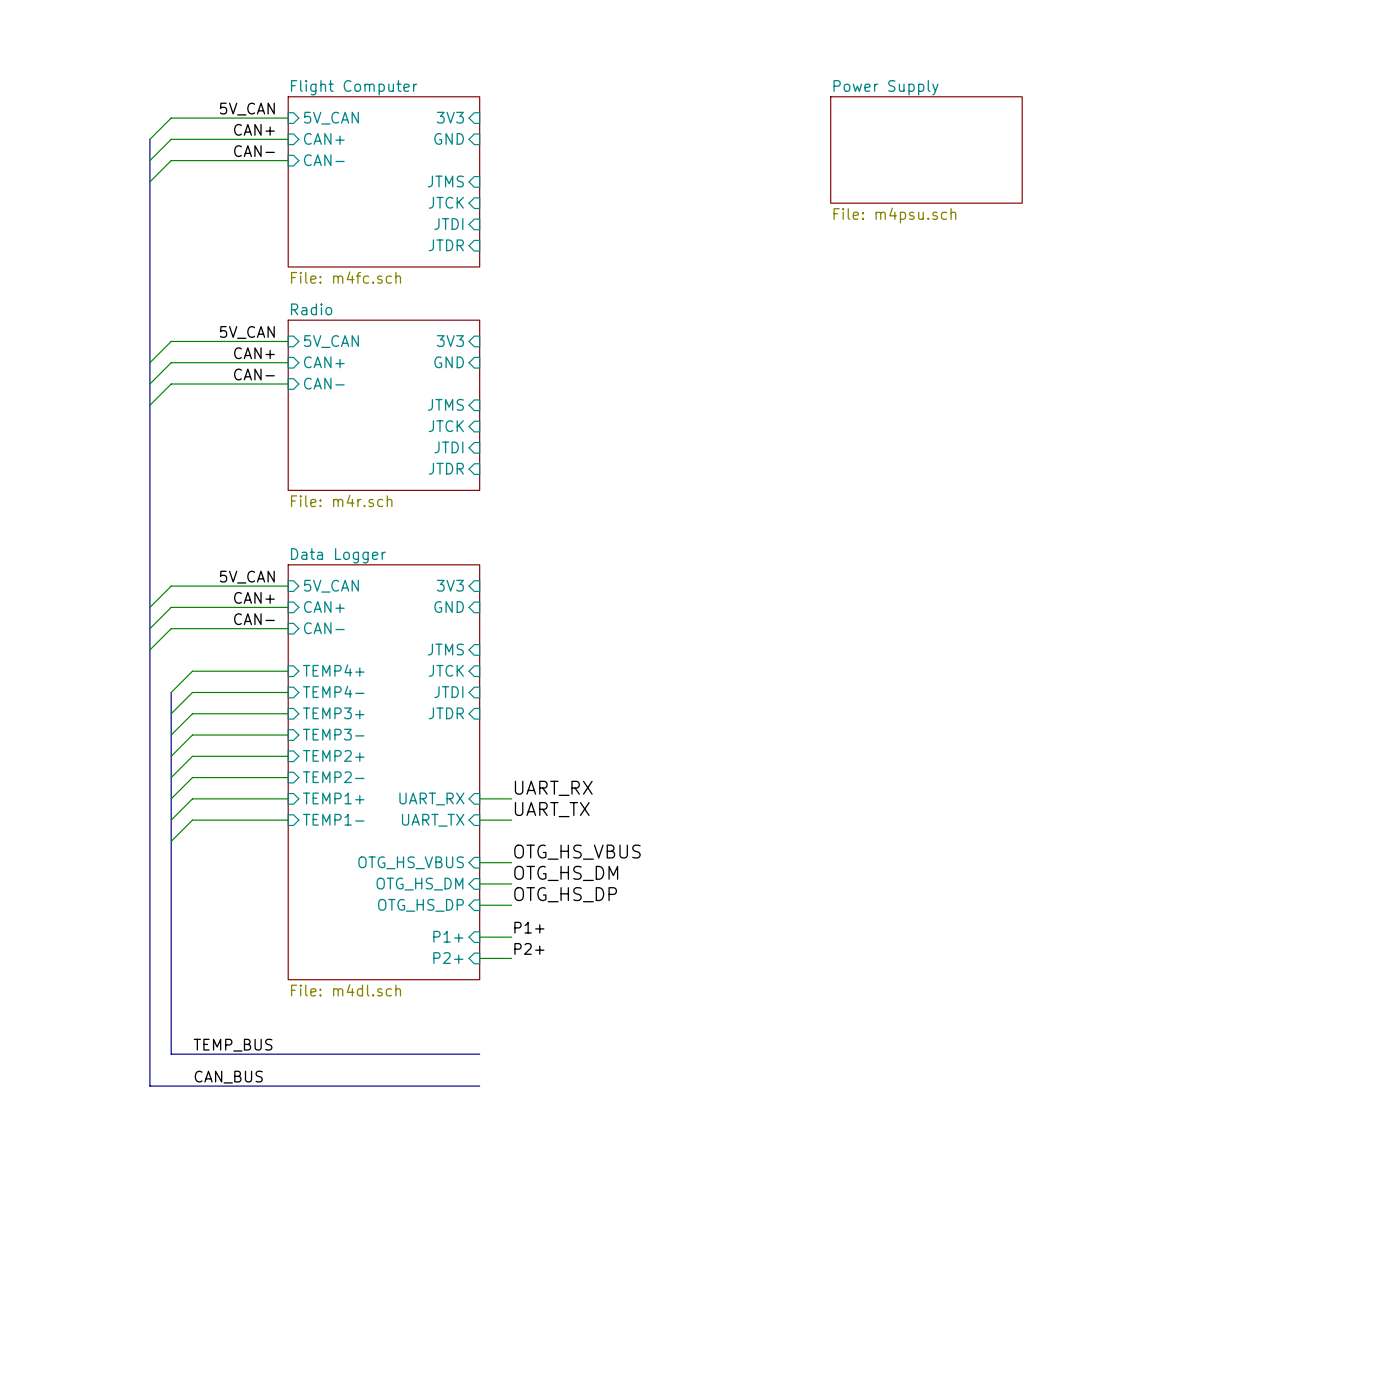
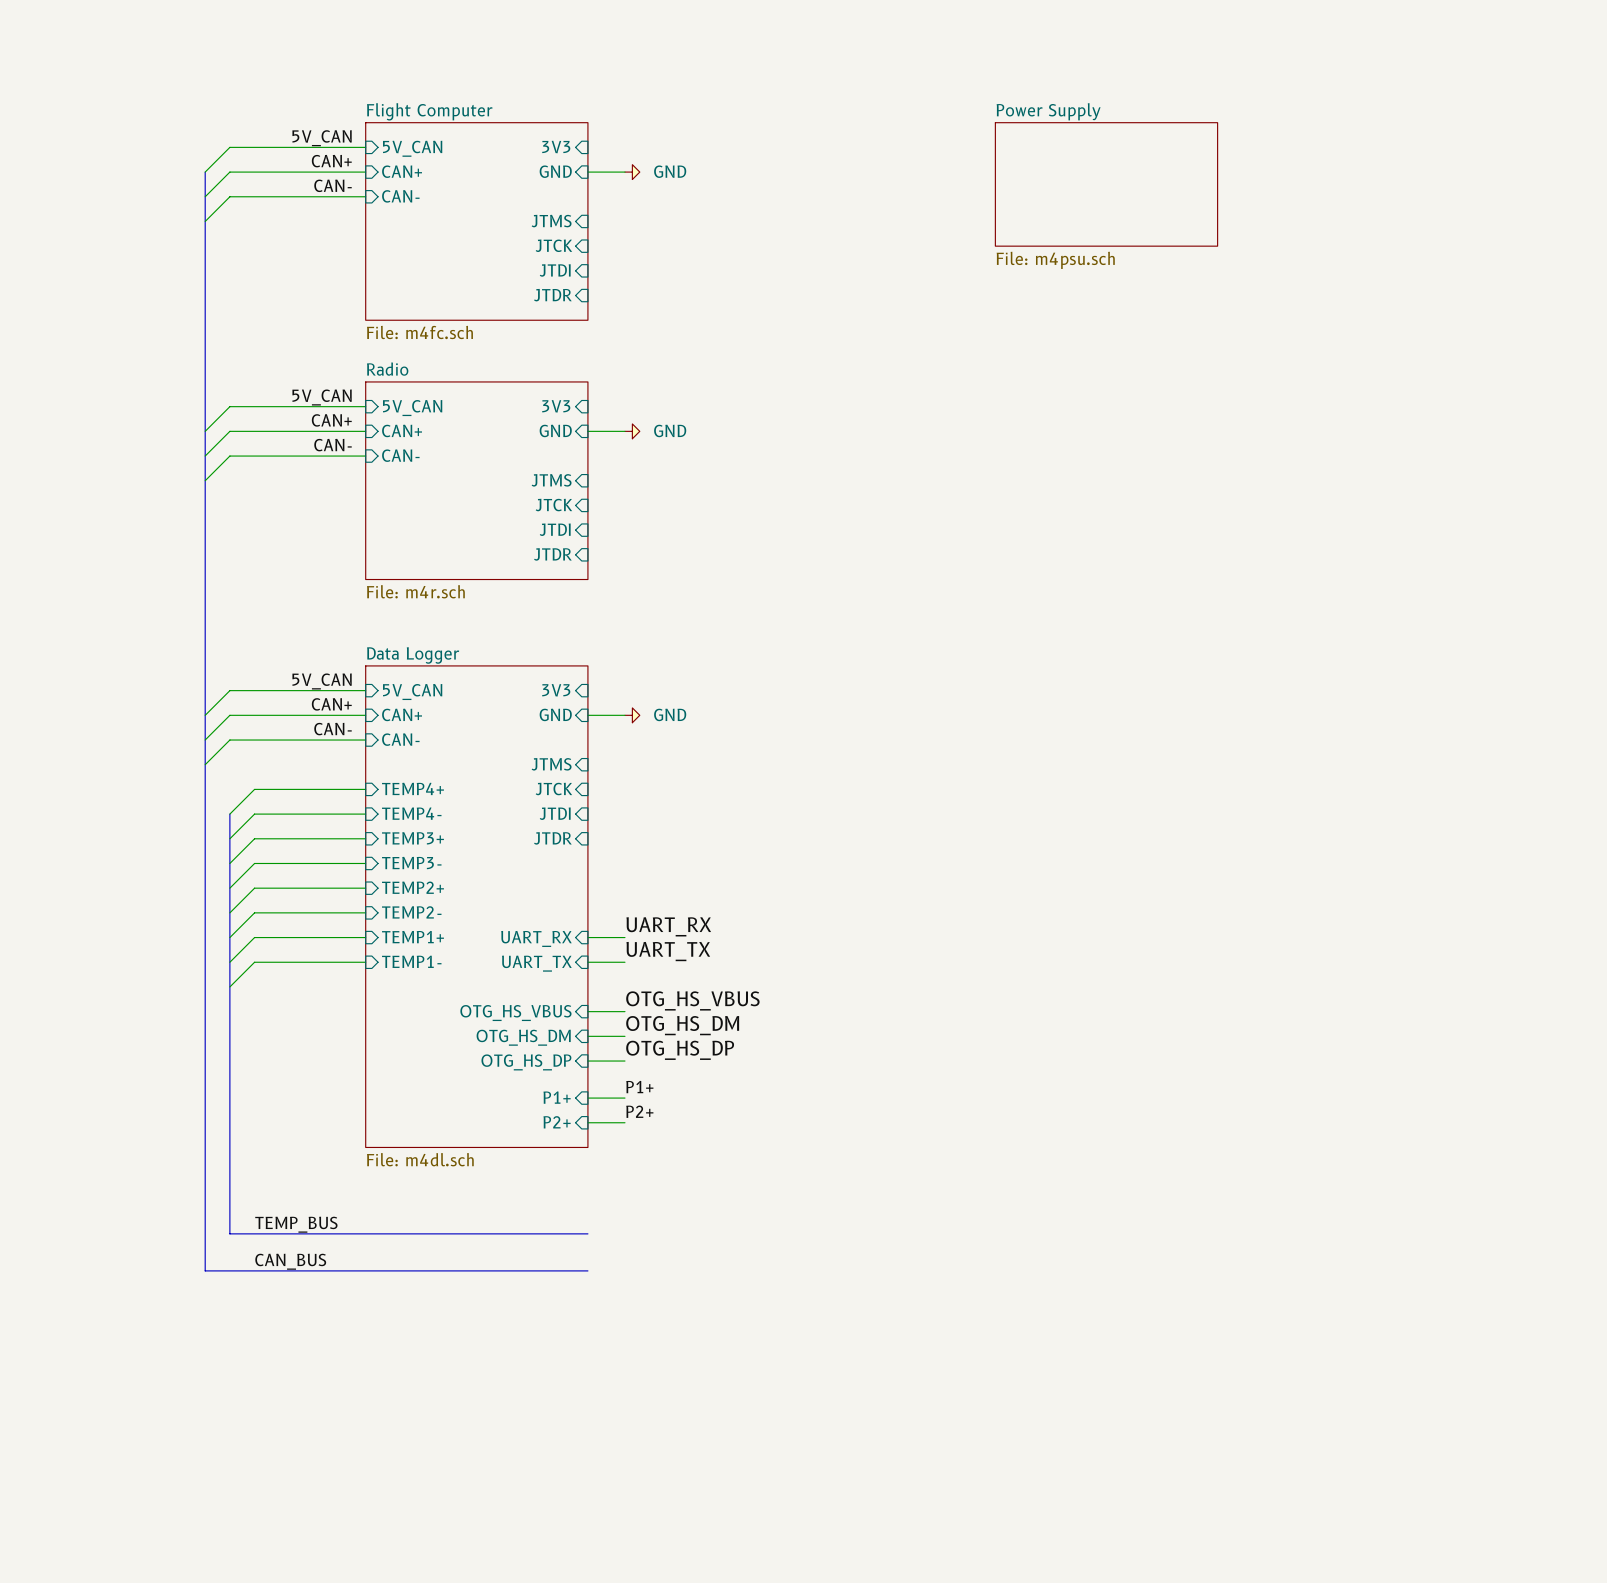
wire: none -> (587, 172) (624, 172)
power symbol: none -> GND (632, 172)
wire: none -> (587, 431) (624, 431)
power symbol: none -> GND (632, 431)
wire: none -> (587, 715) (624, 715)
power symbol: none -> GND (632, 715)

